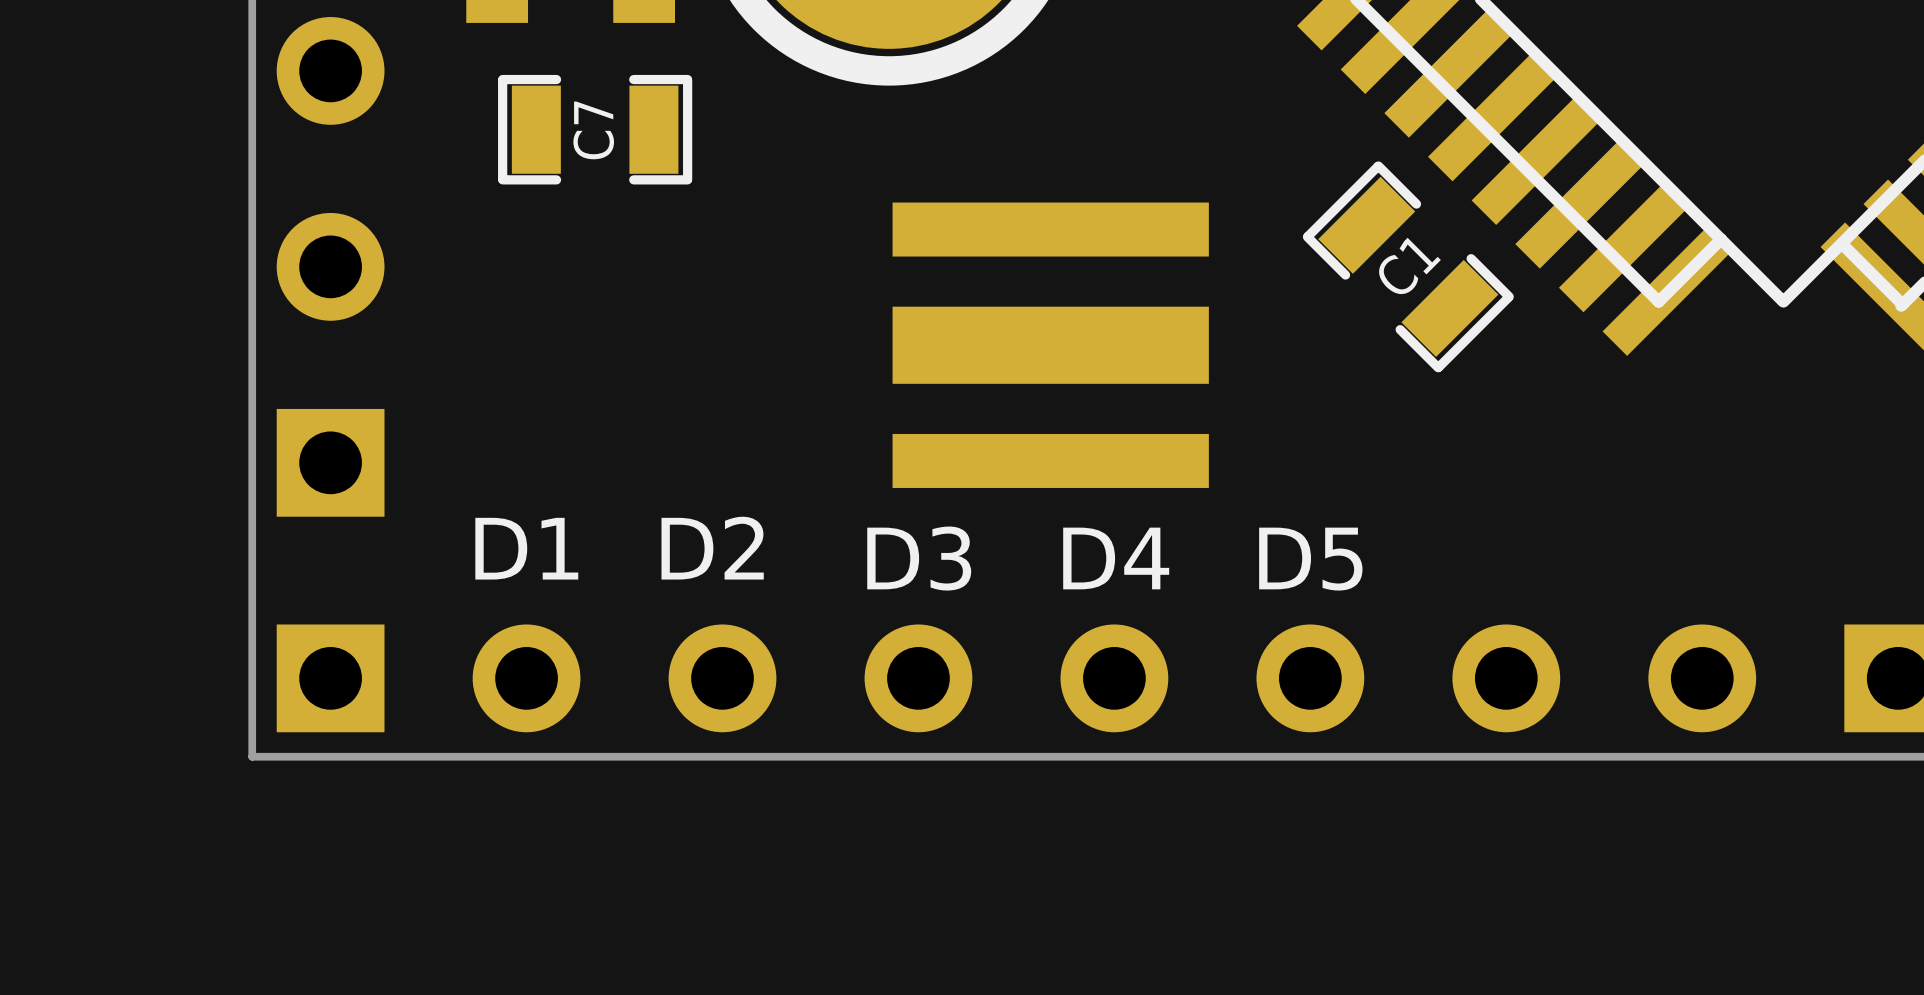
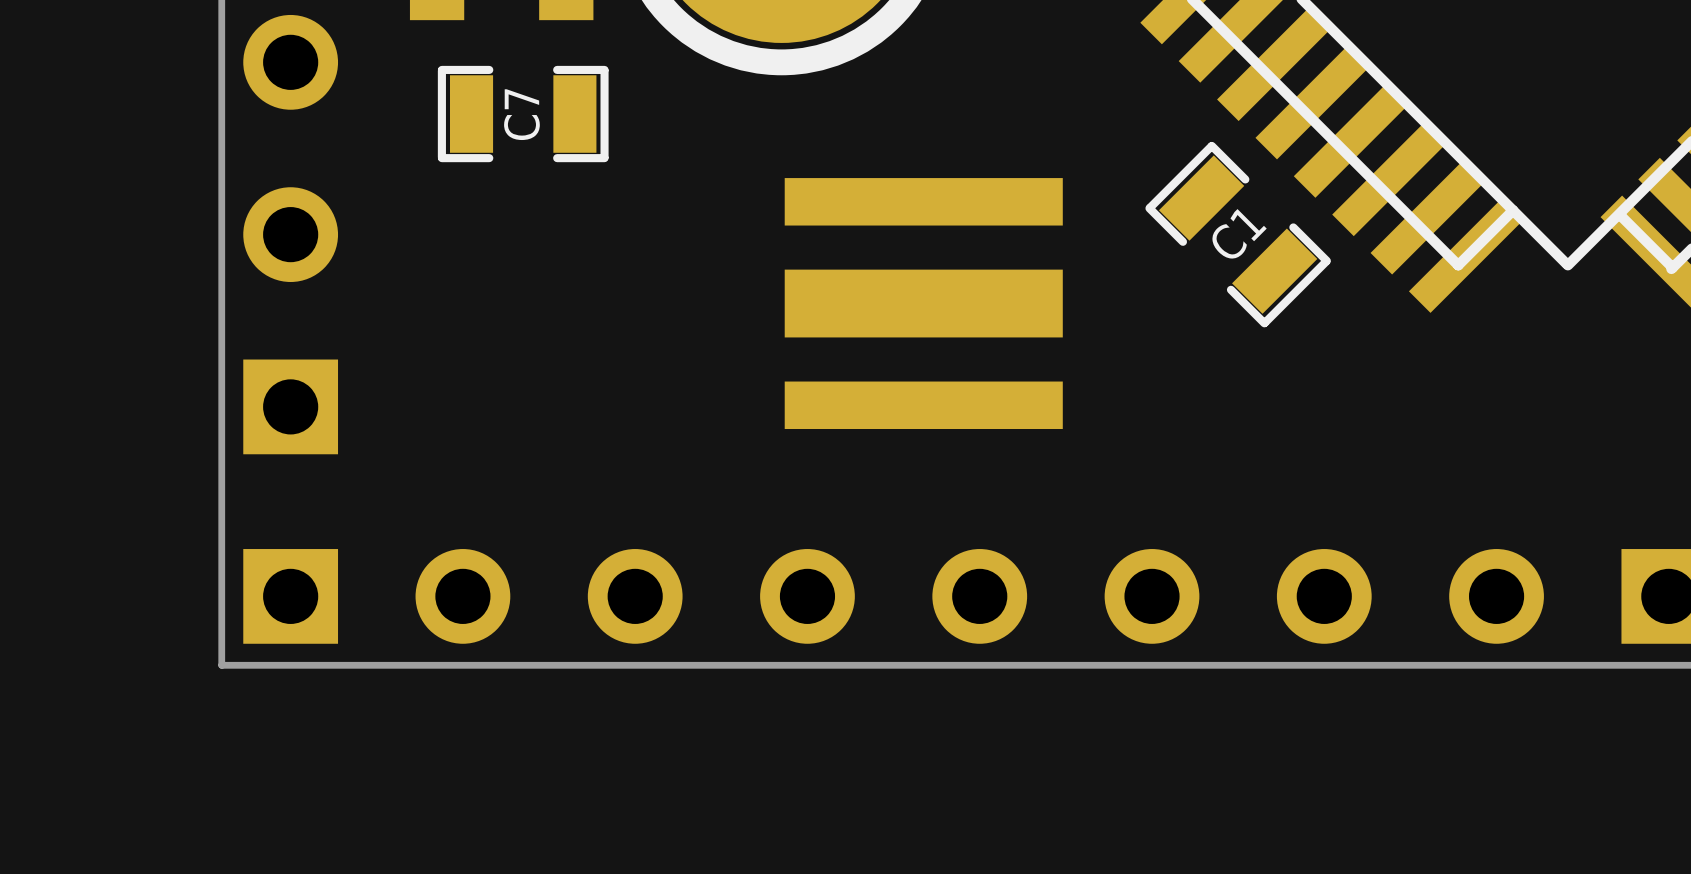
text: D1 (526, 548) -> none
text: D2 (712, 548) -> none
text: D3 (919, 558) -> none
text: D4 (1116, 558) -> none
text: D5 (1310, 559) -> none

